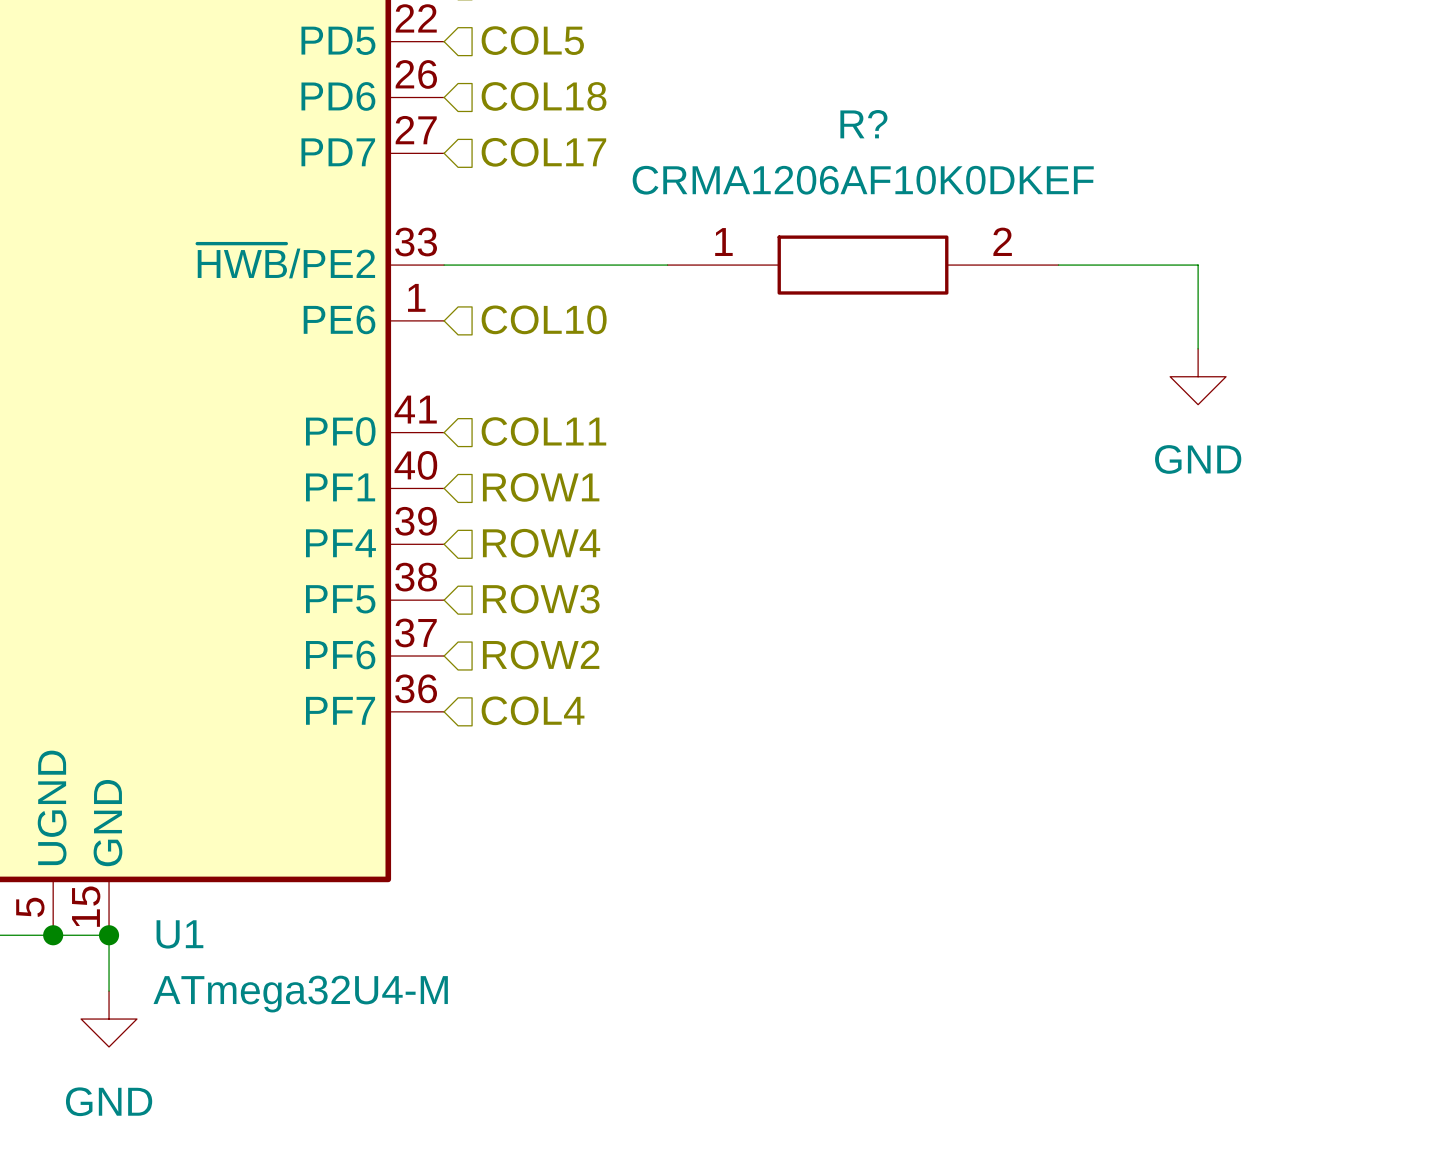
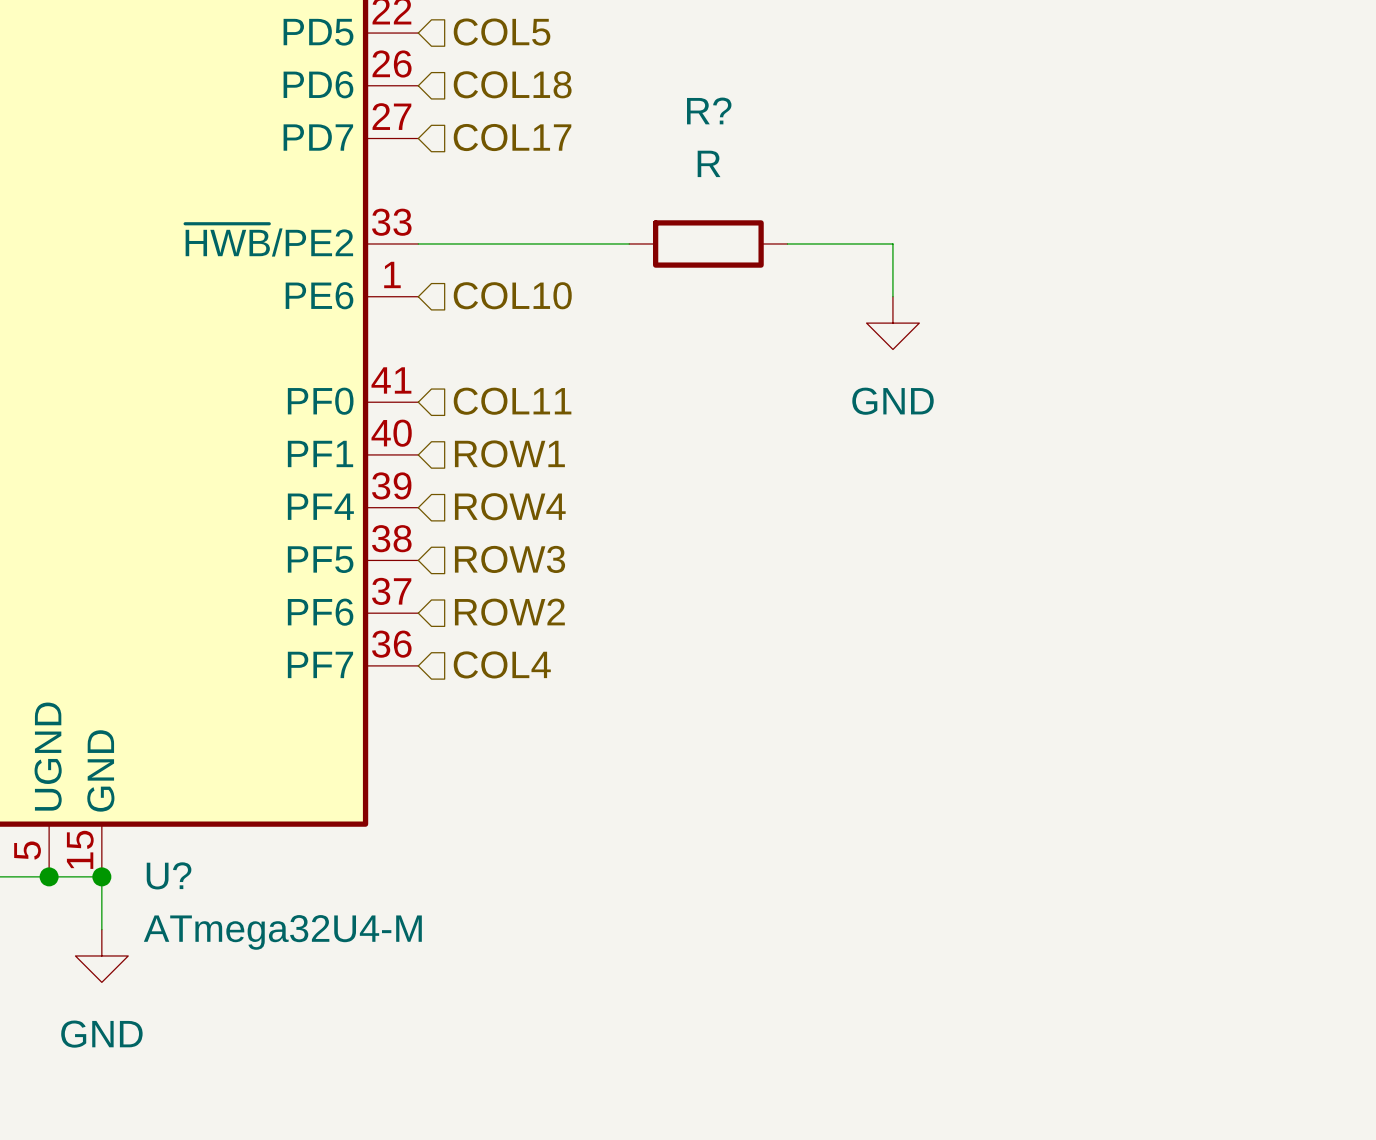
R?: none -> R (708, 243)
wire: none -> (787, 243) (892, 243) (892, 296)
R?: CRMA1206AF10K0DKEF (863, 265) -> none
wire: (1058, 265) (1198, 265) (1198, 348) -> none
power symbol position: GND (1198, 376) -> GND (892, 323)
U1 name: U1 (179, 934) -> U? (169, 875)

